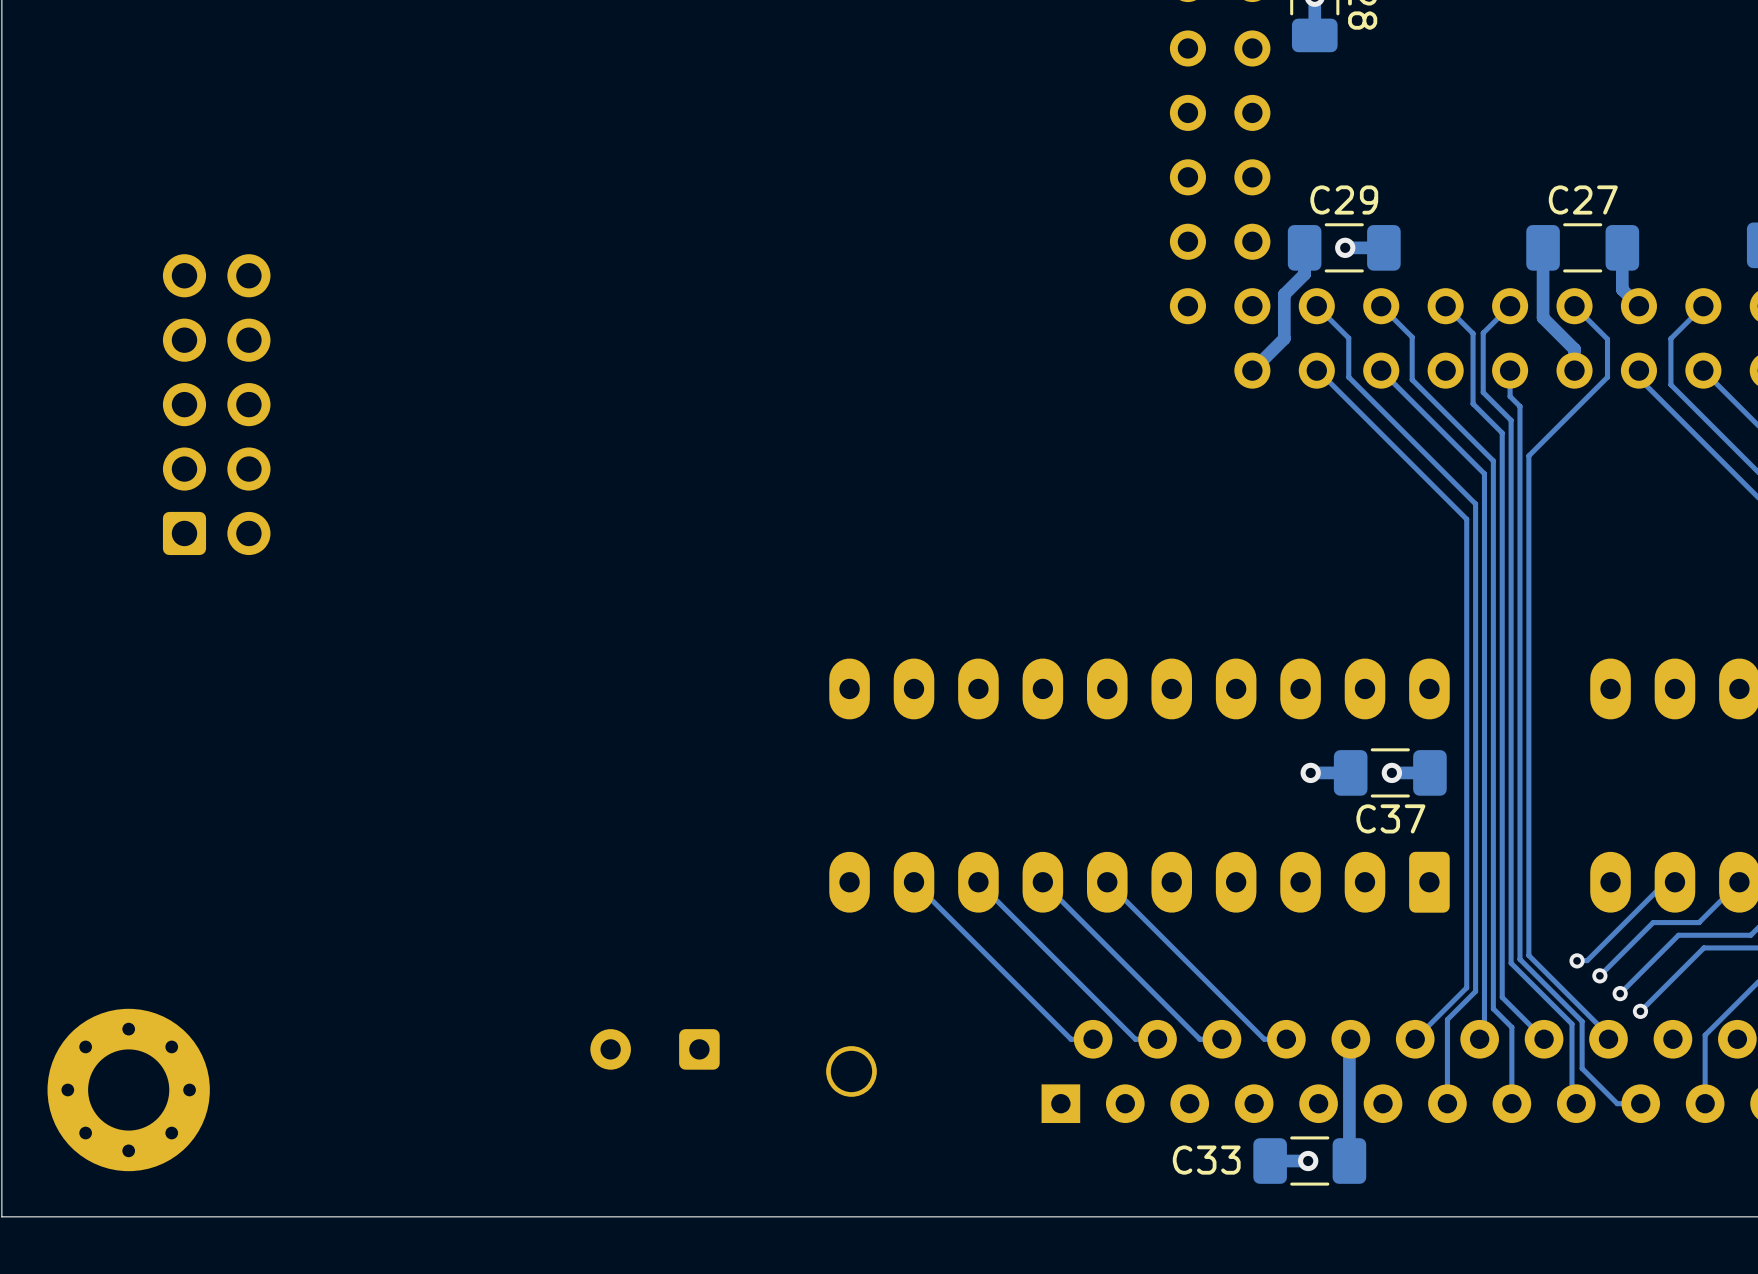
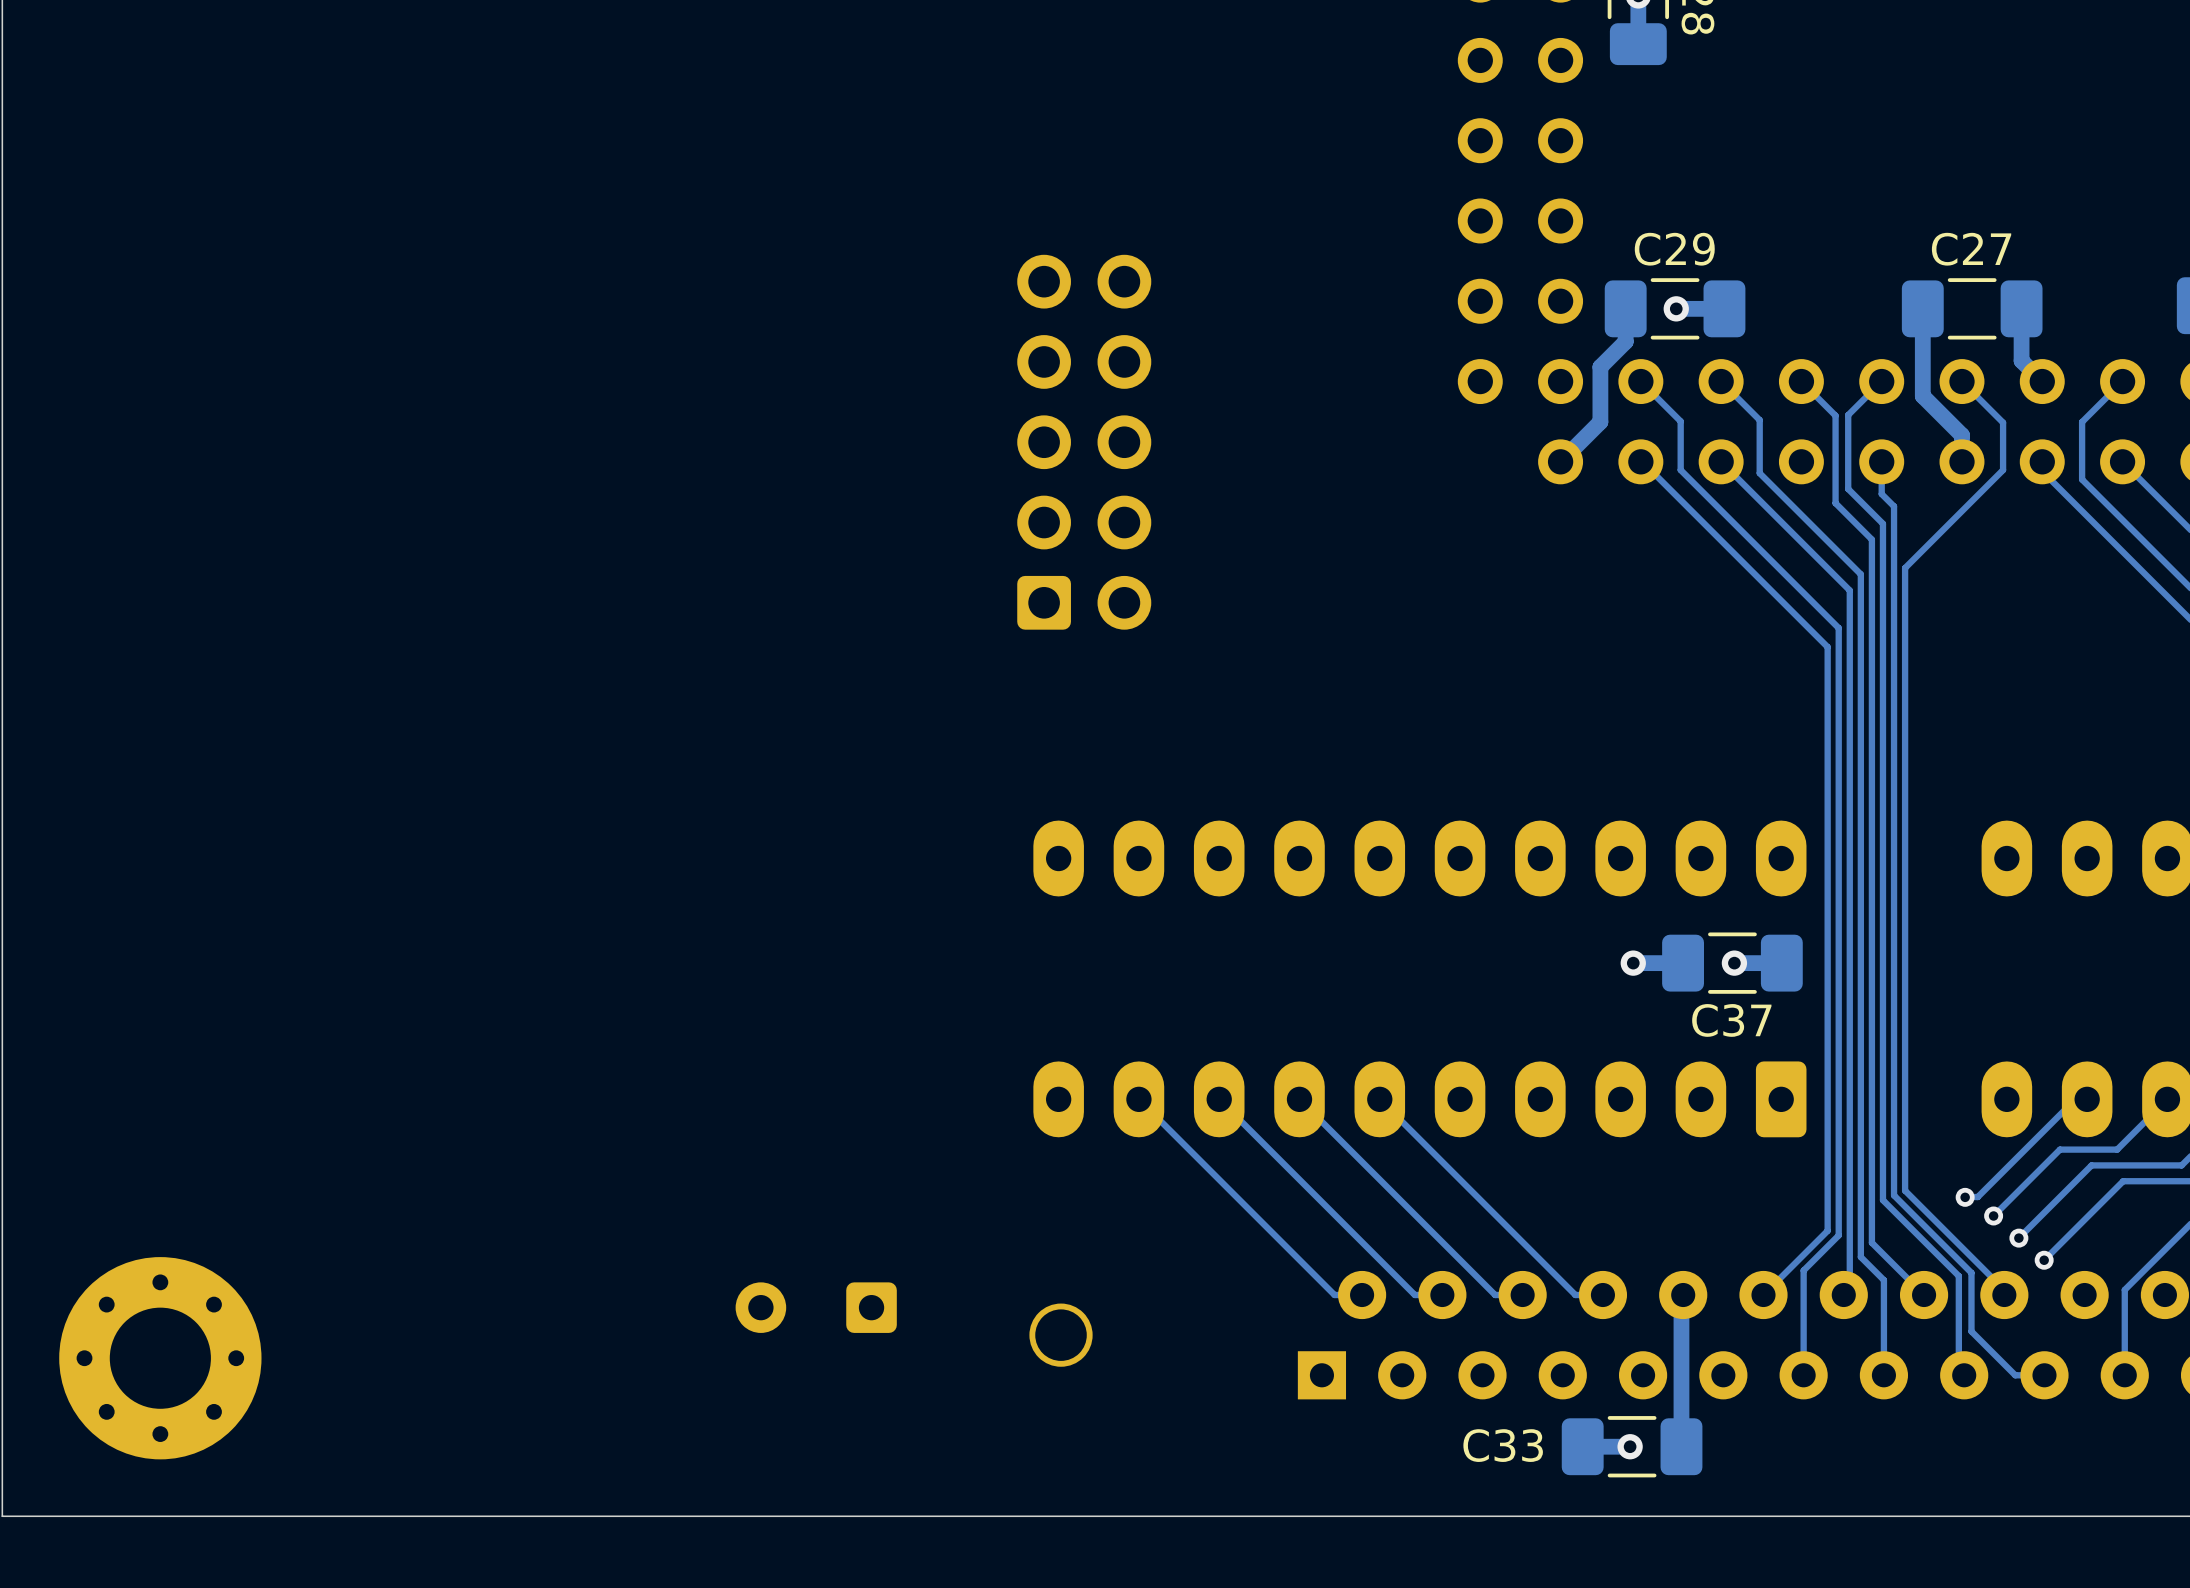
part: none -> (1084, 442)
part: (216, 404) -> none

